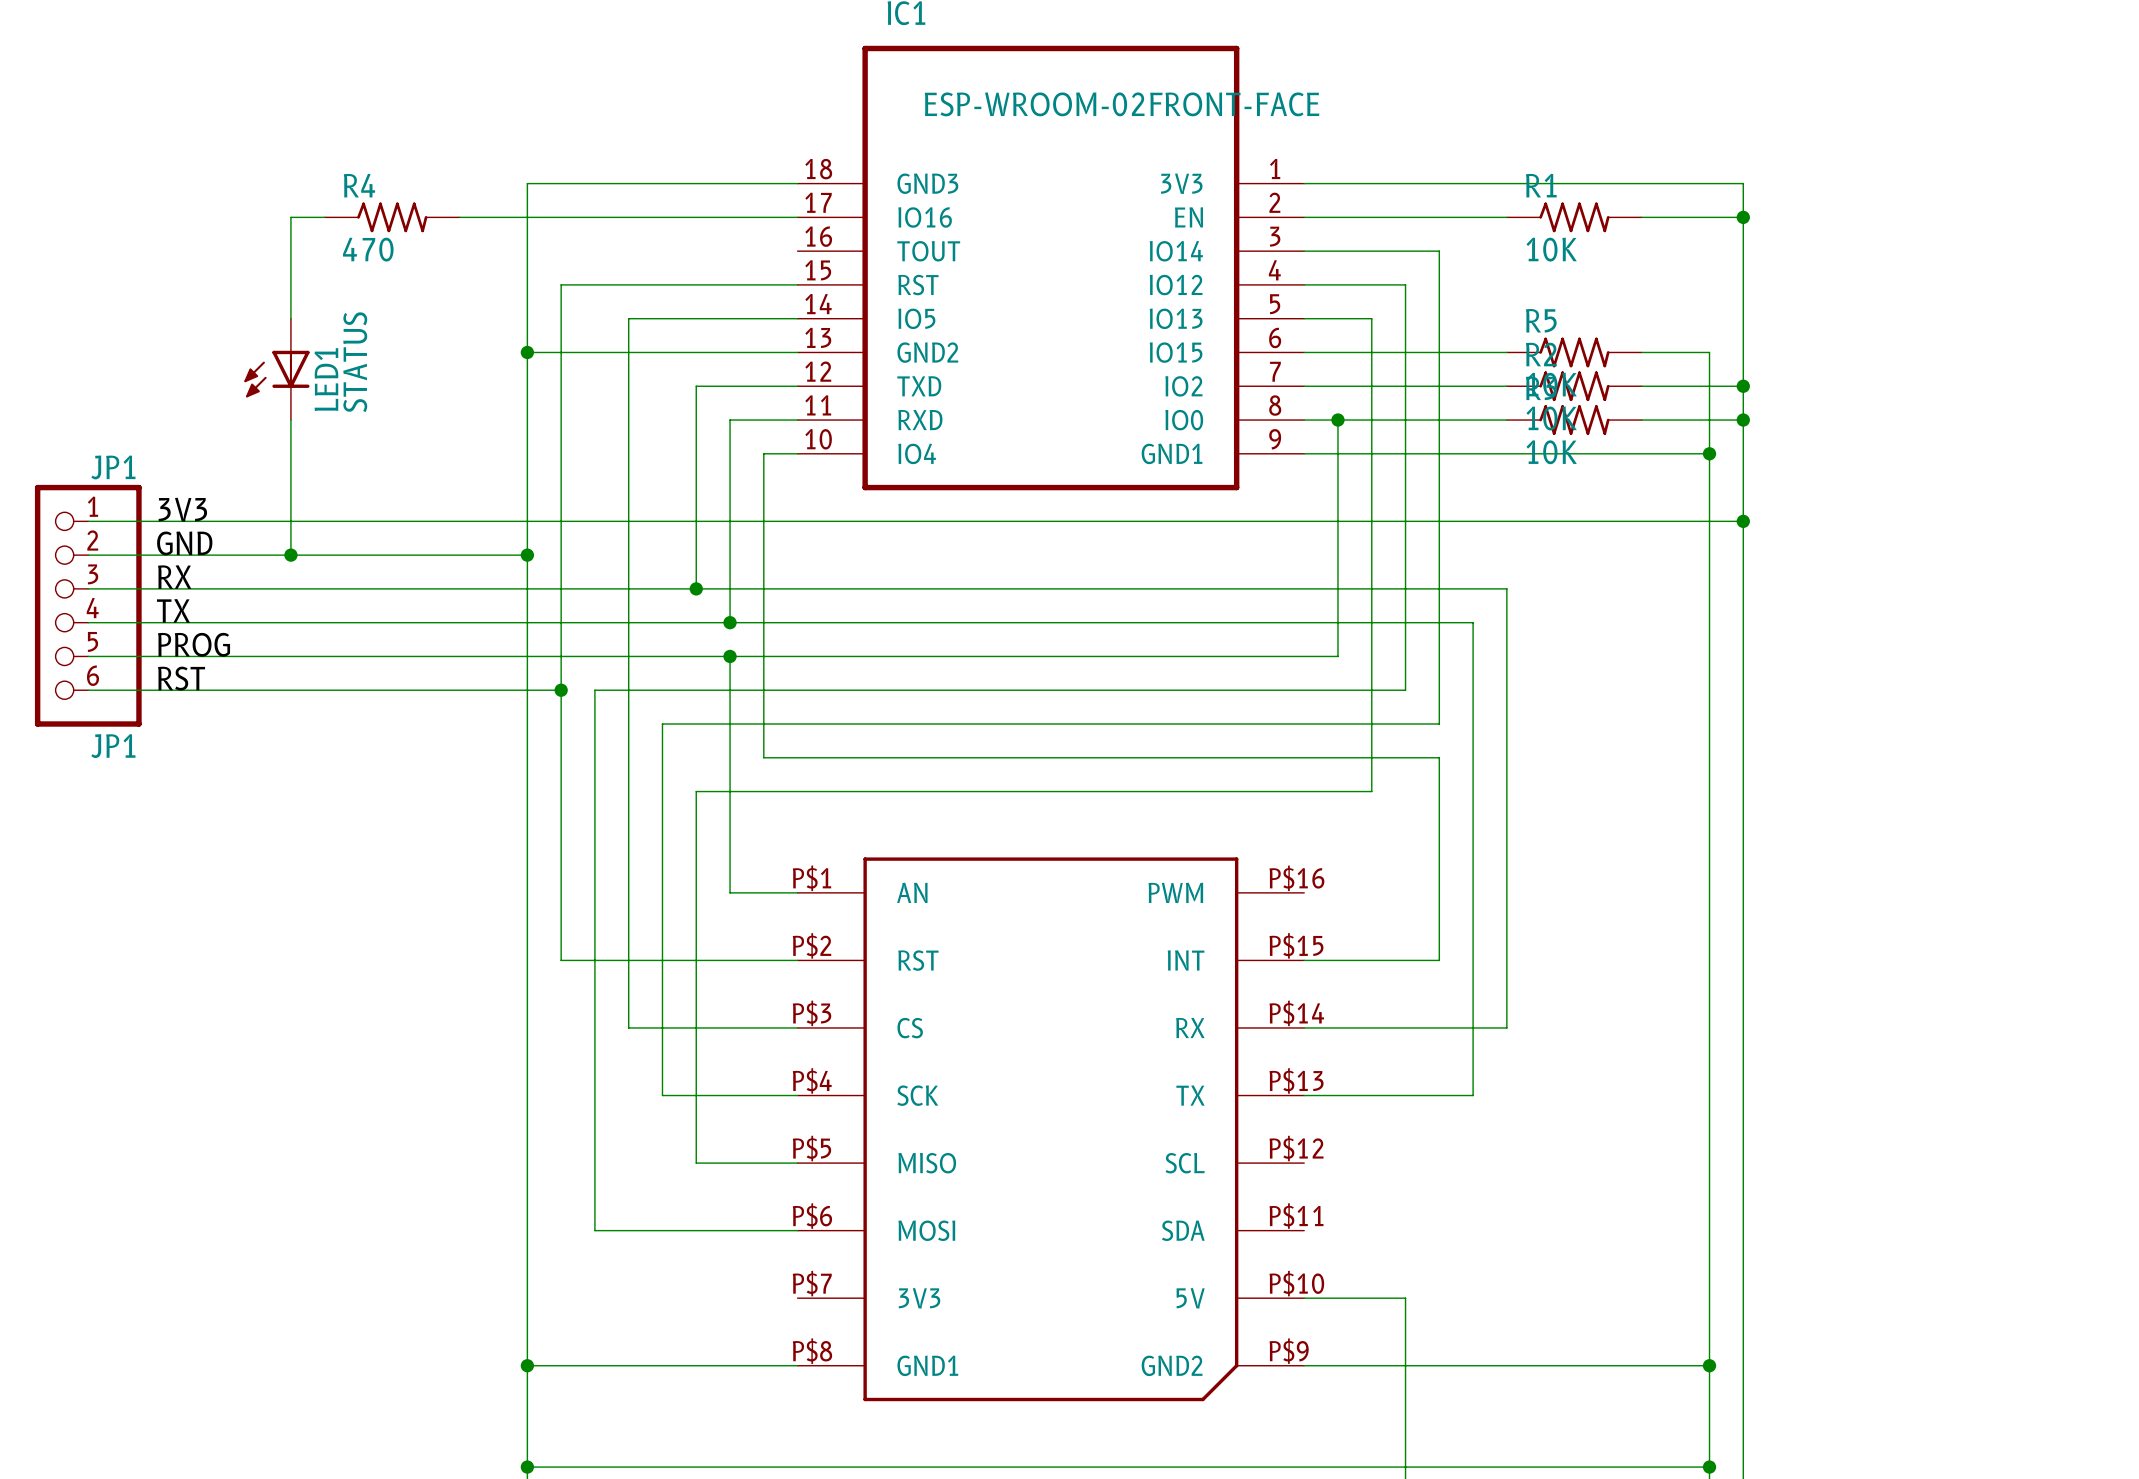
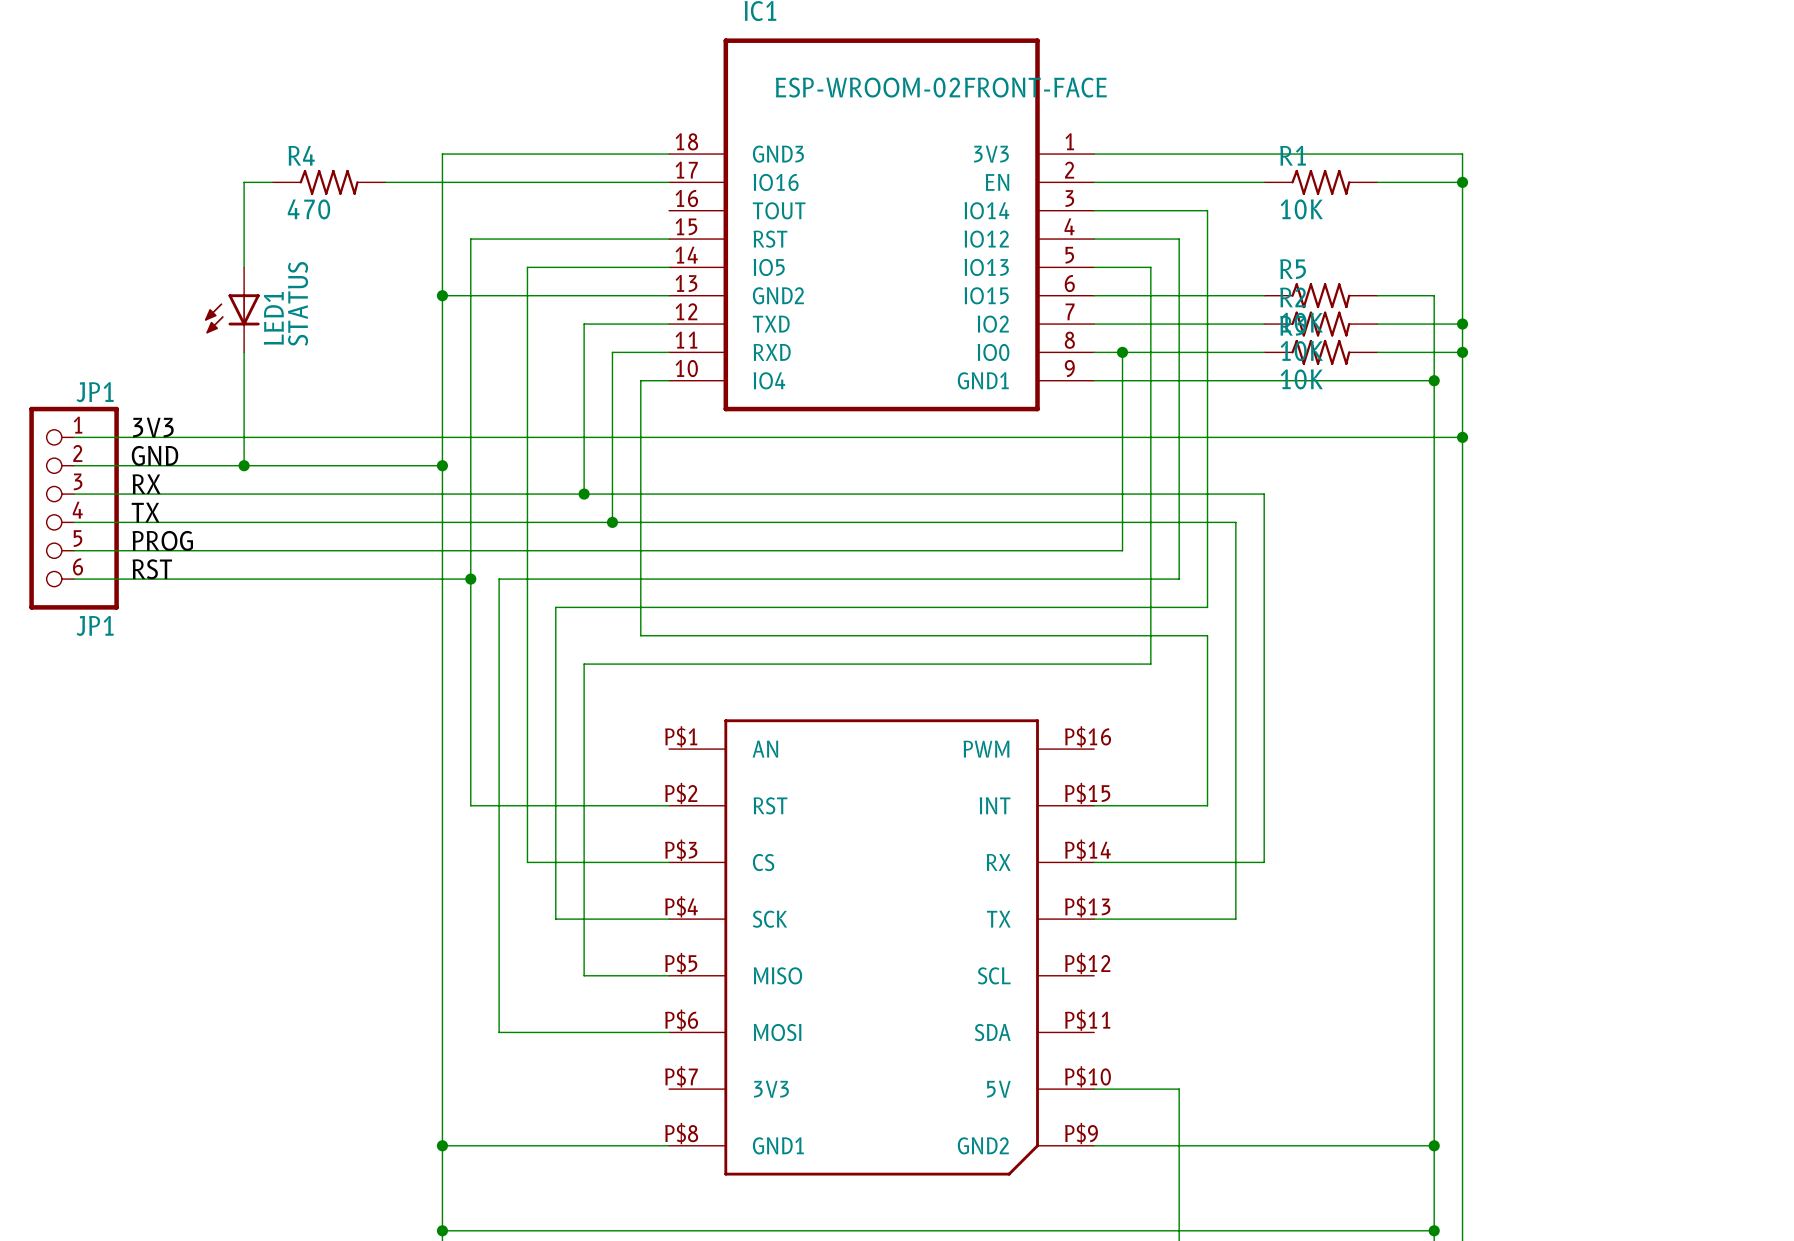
wire: (730, 656) (730, 892) (797, 892) -> none
junction: (730, 656) -> none

